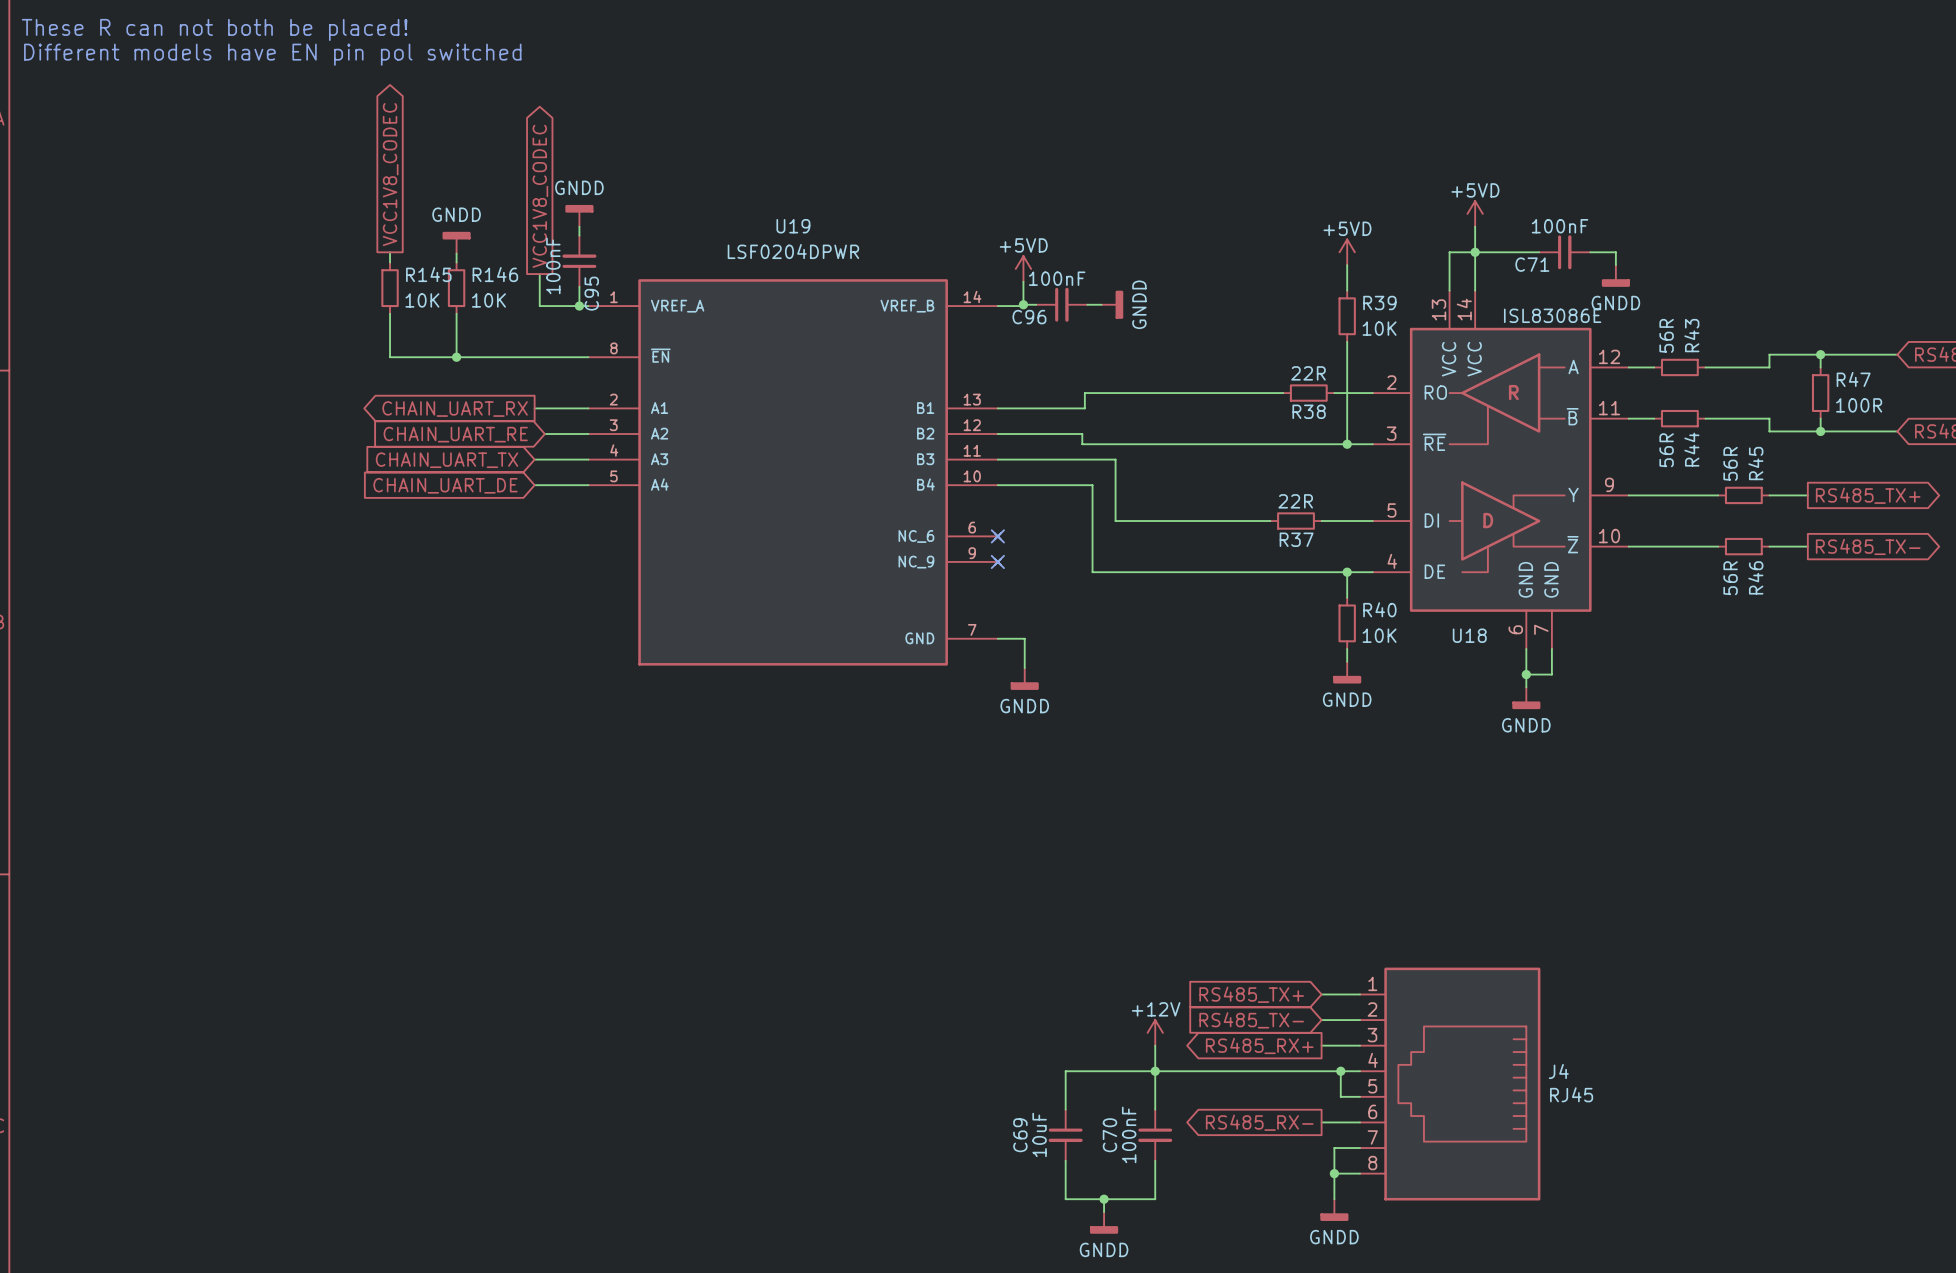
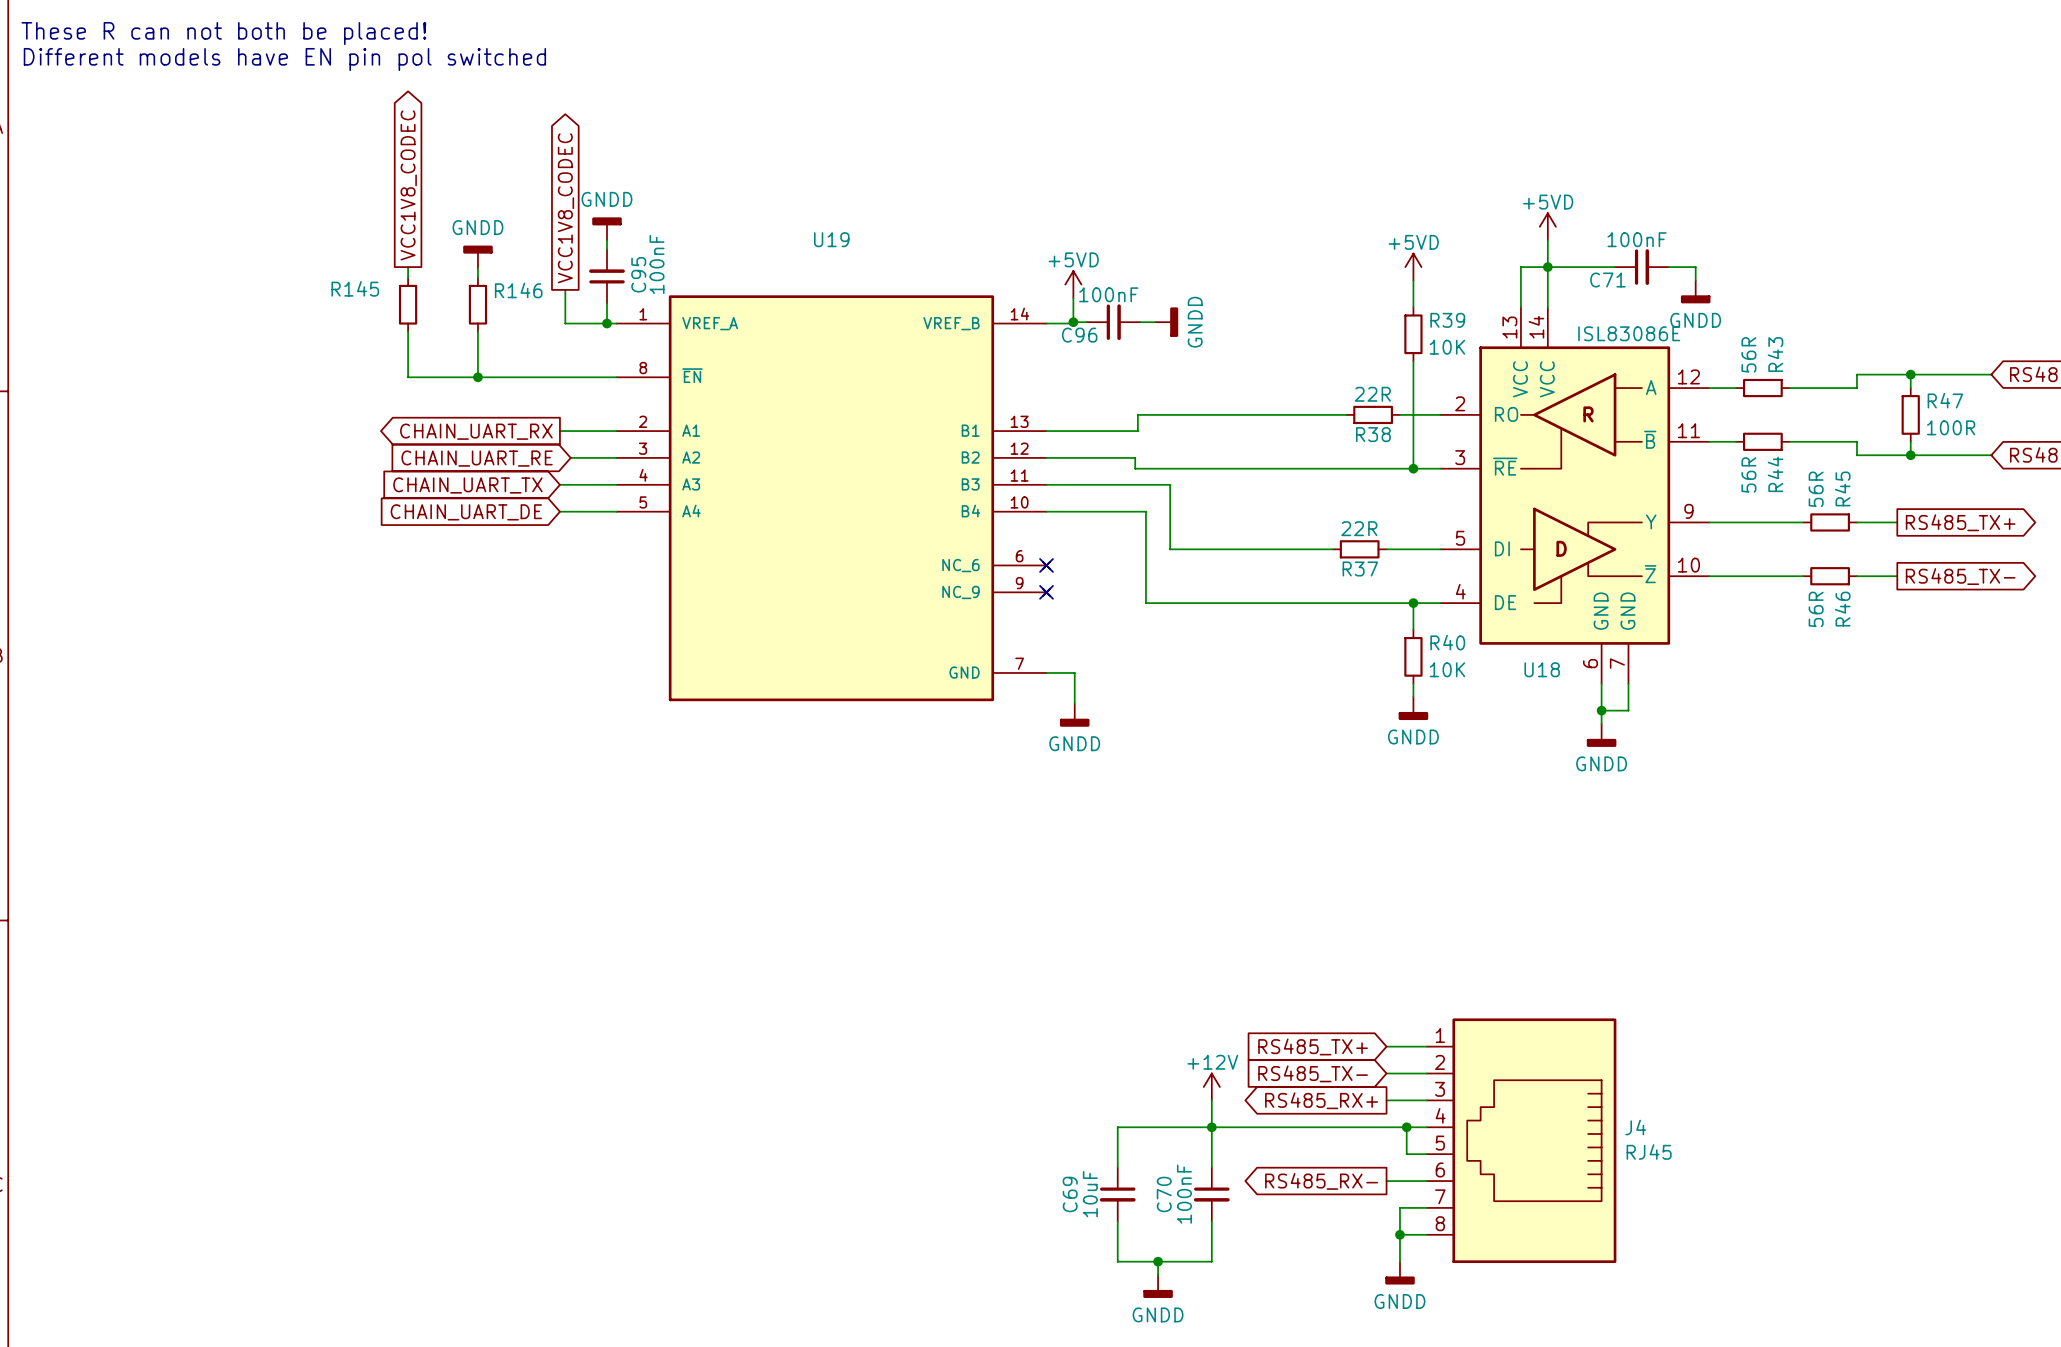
U19 value: LSF0204DPWR (793, 251) -> none
C95 value position: 100nF (553, 265) -> 100nF (657, 264)
R145 name position: R145 (428, 274) -> R145 (355, 288)
C95 name position: C95 (591, 293) -> C95 (638, 274)
R145 value: 10K (422, 300) -> none
R146 value: 10K (488, 300) -> none

